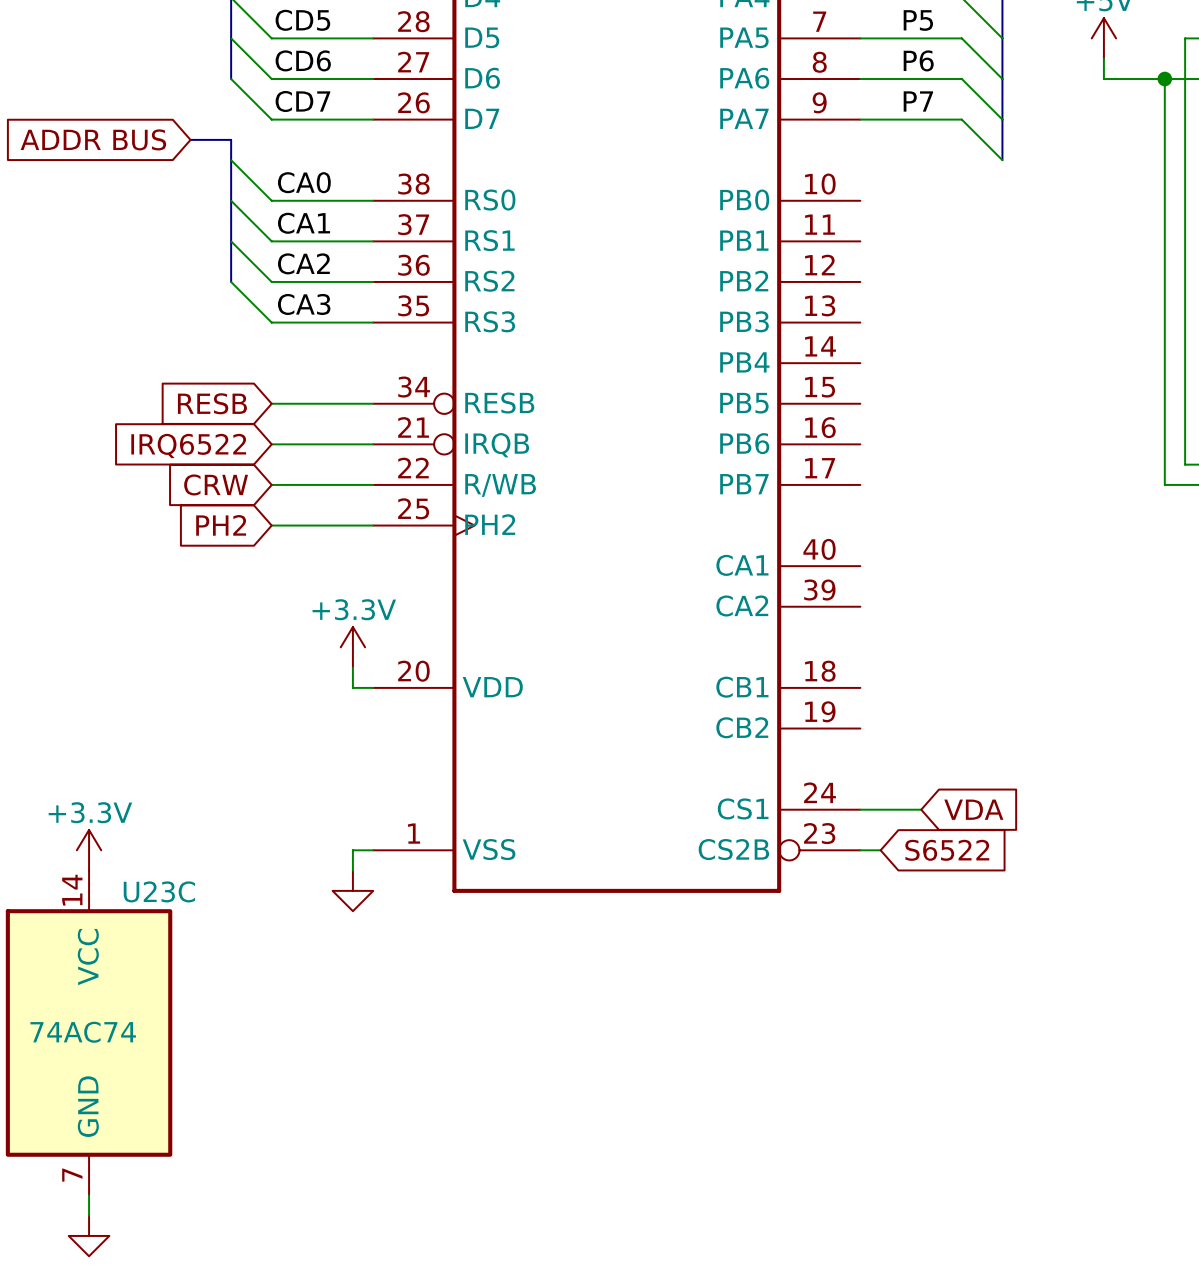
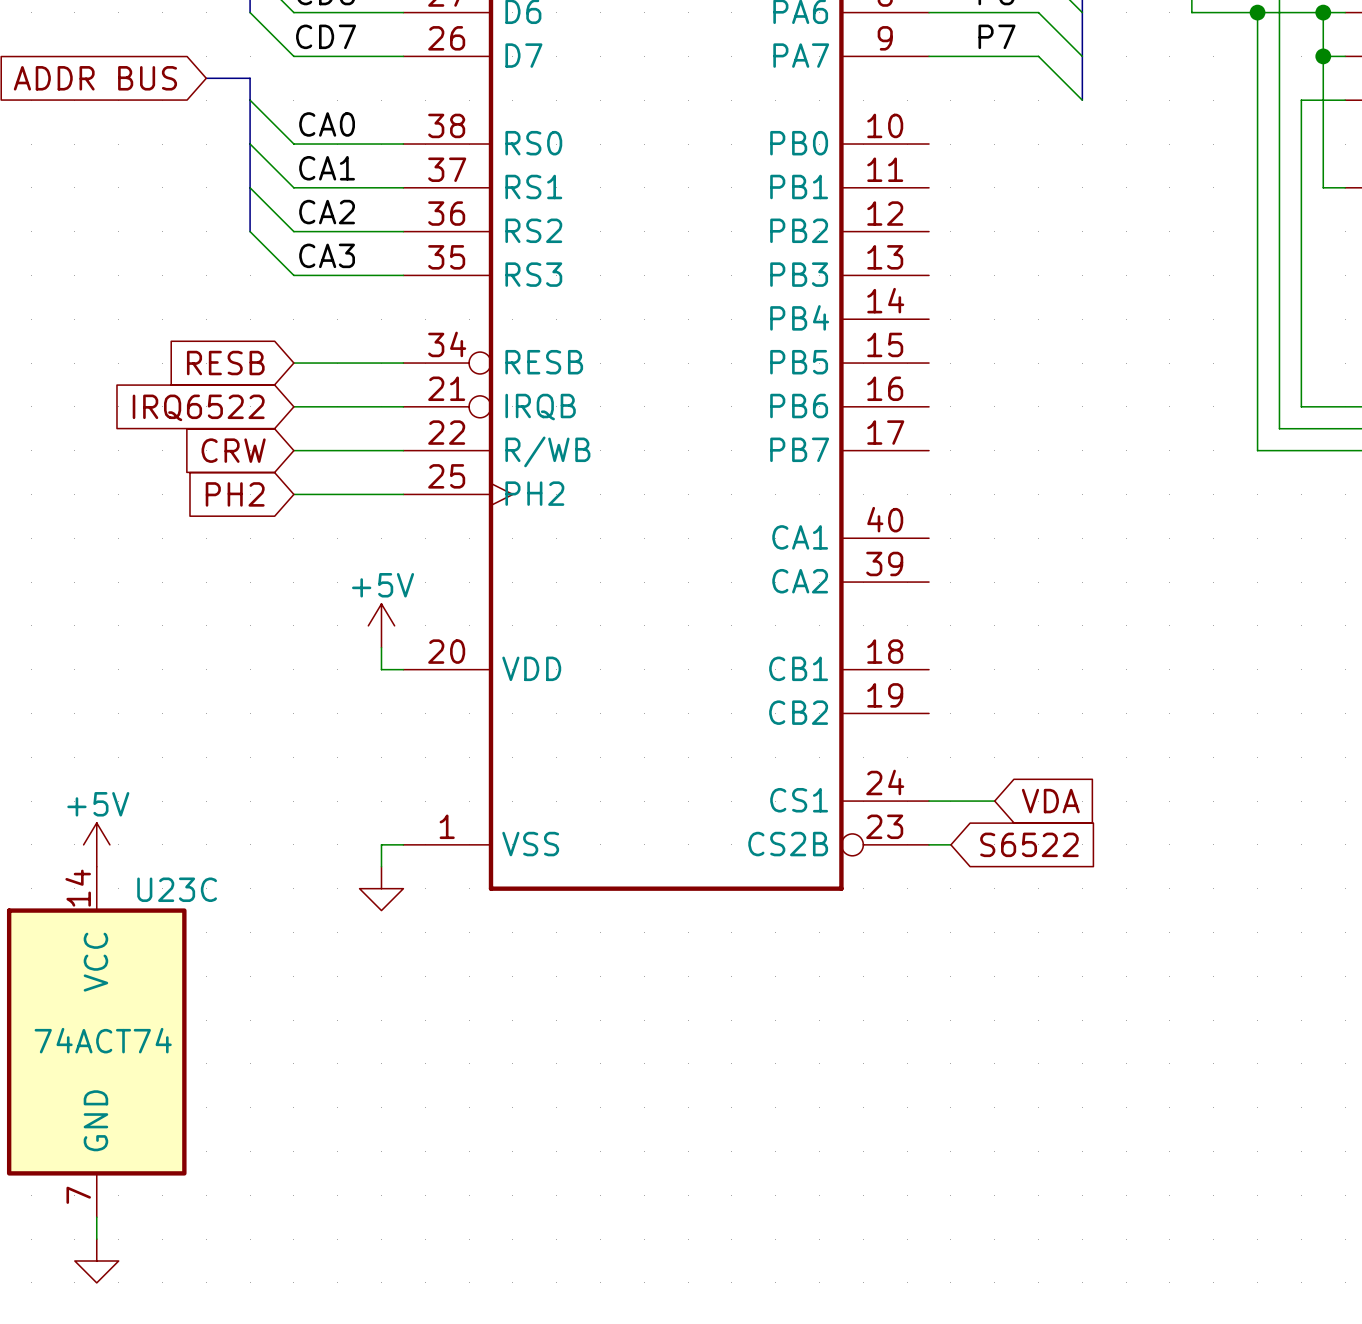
power symbol: +3.3V (352, 647) -> +5V (381, 625)
power symbol: +3.3V (89, 850) -> +5V (96, 844)
U23C value: 74AC74 (83, 1032) -> 74ACT74 (103, 1040)

